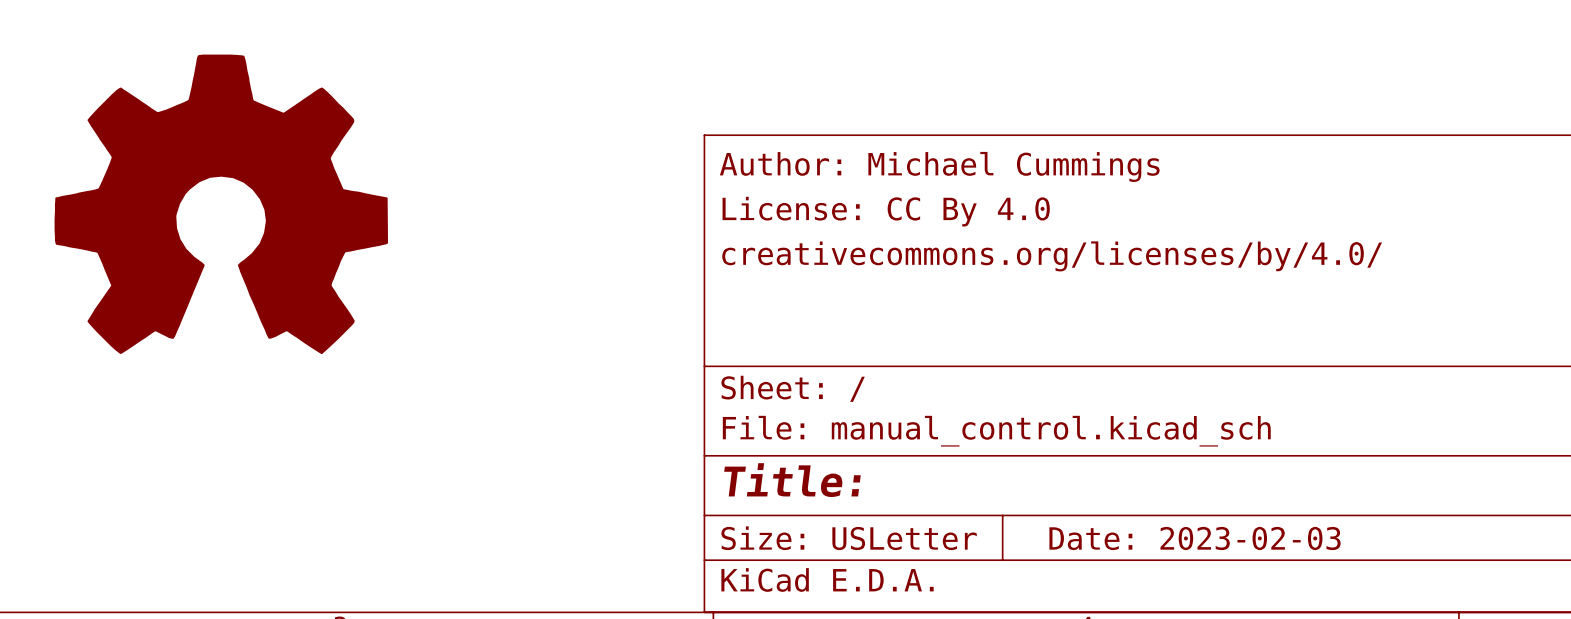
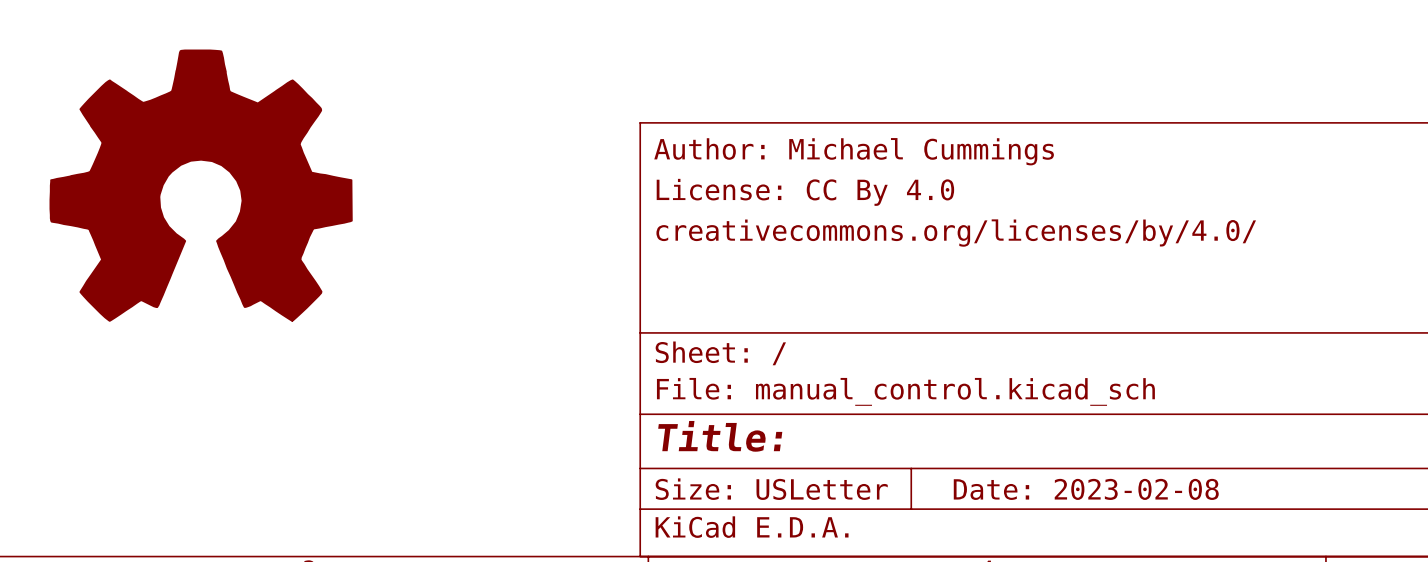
title block: Date: 2023-02-03 (1195, 538) -> Date: 2023-02-08 (1086, 489)

